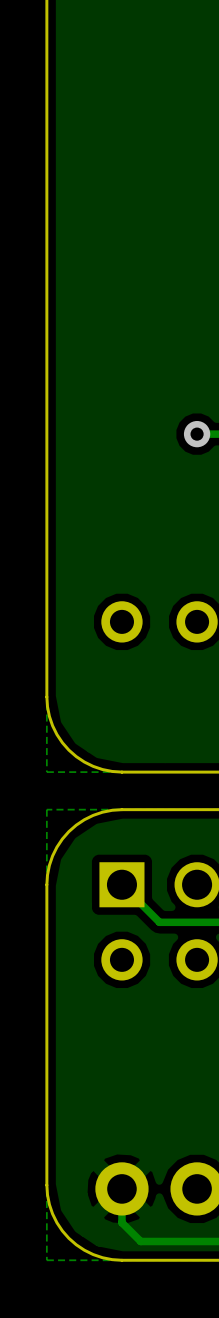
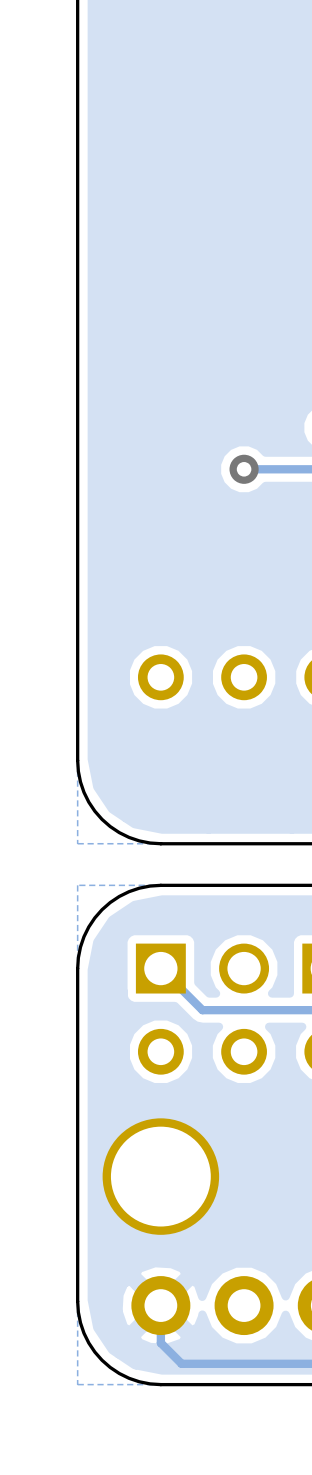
part: none -> (160, 1176)

